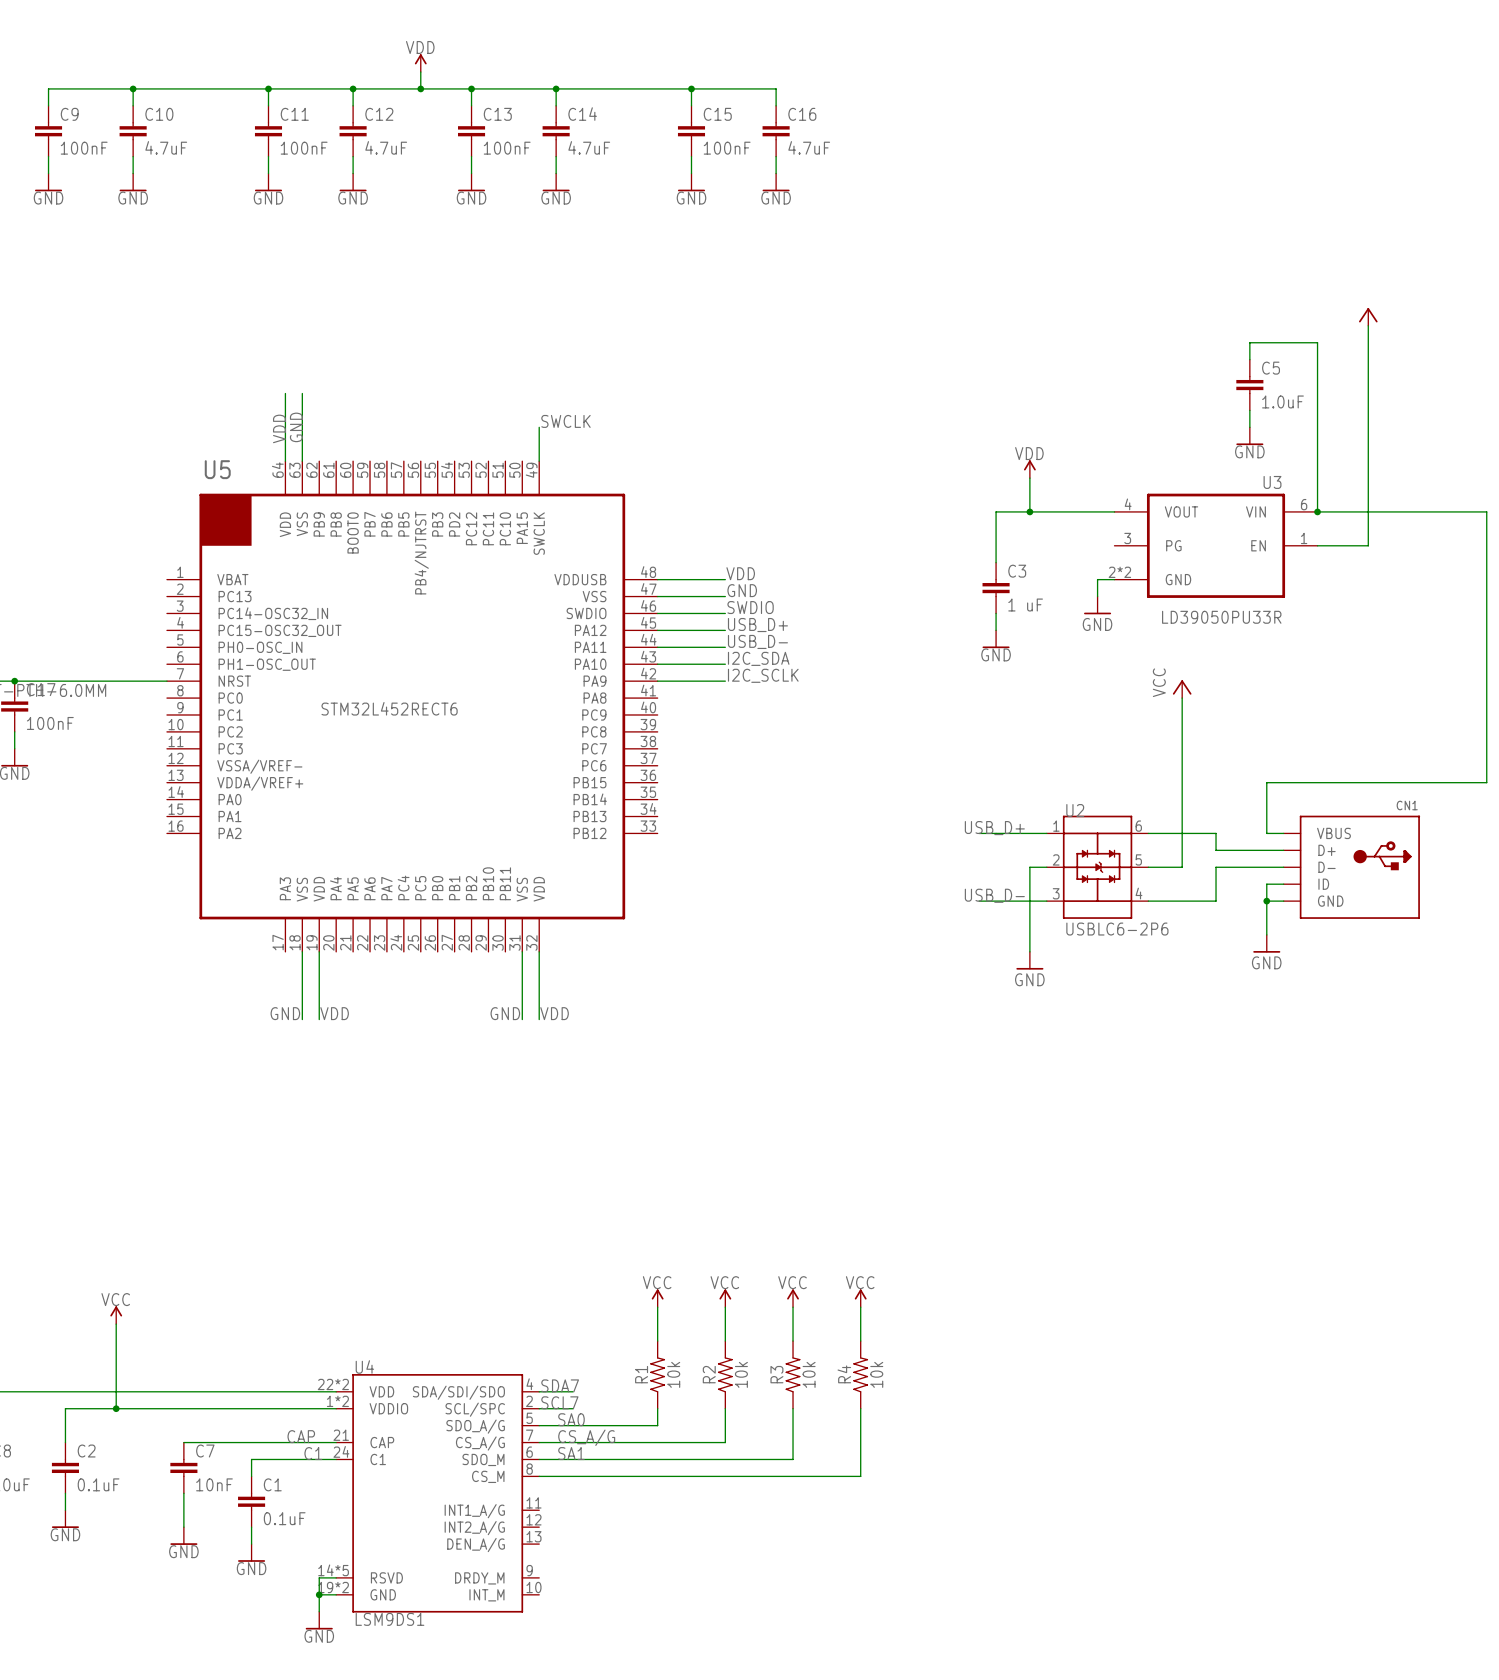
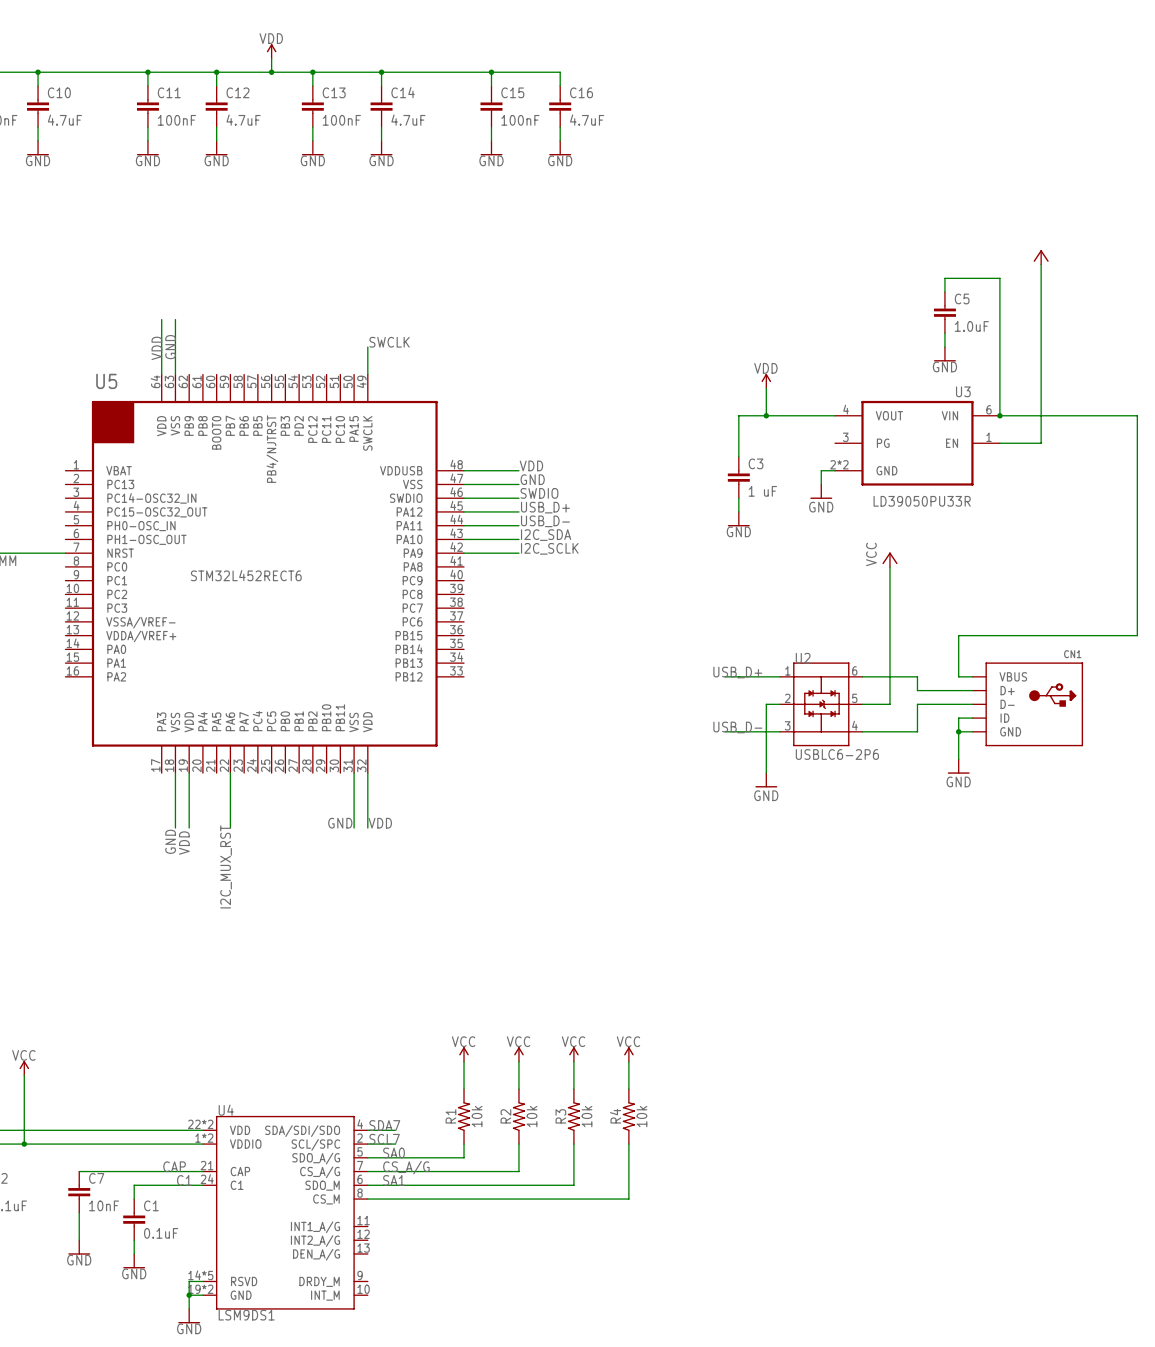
wire: none -> (230, 773) (230, 828)
label rotation: 0° (285, 1013) -> 90° counterclockwise (170, 841)
label rotation: 0° (334, 1013) -> 90° counterclockwise (184, 843)
label: none -> I2C_MUX_RST (226, 866)

